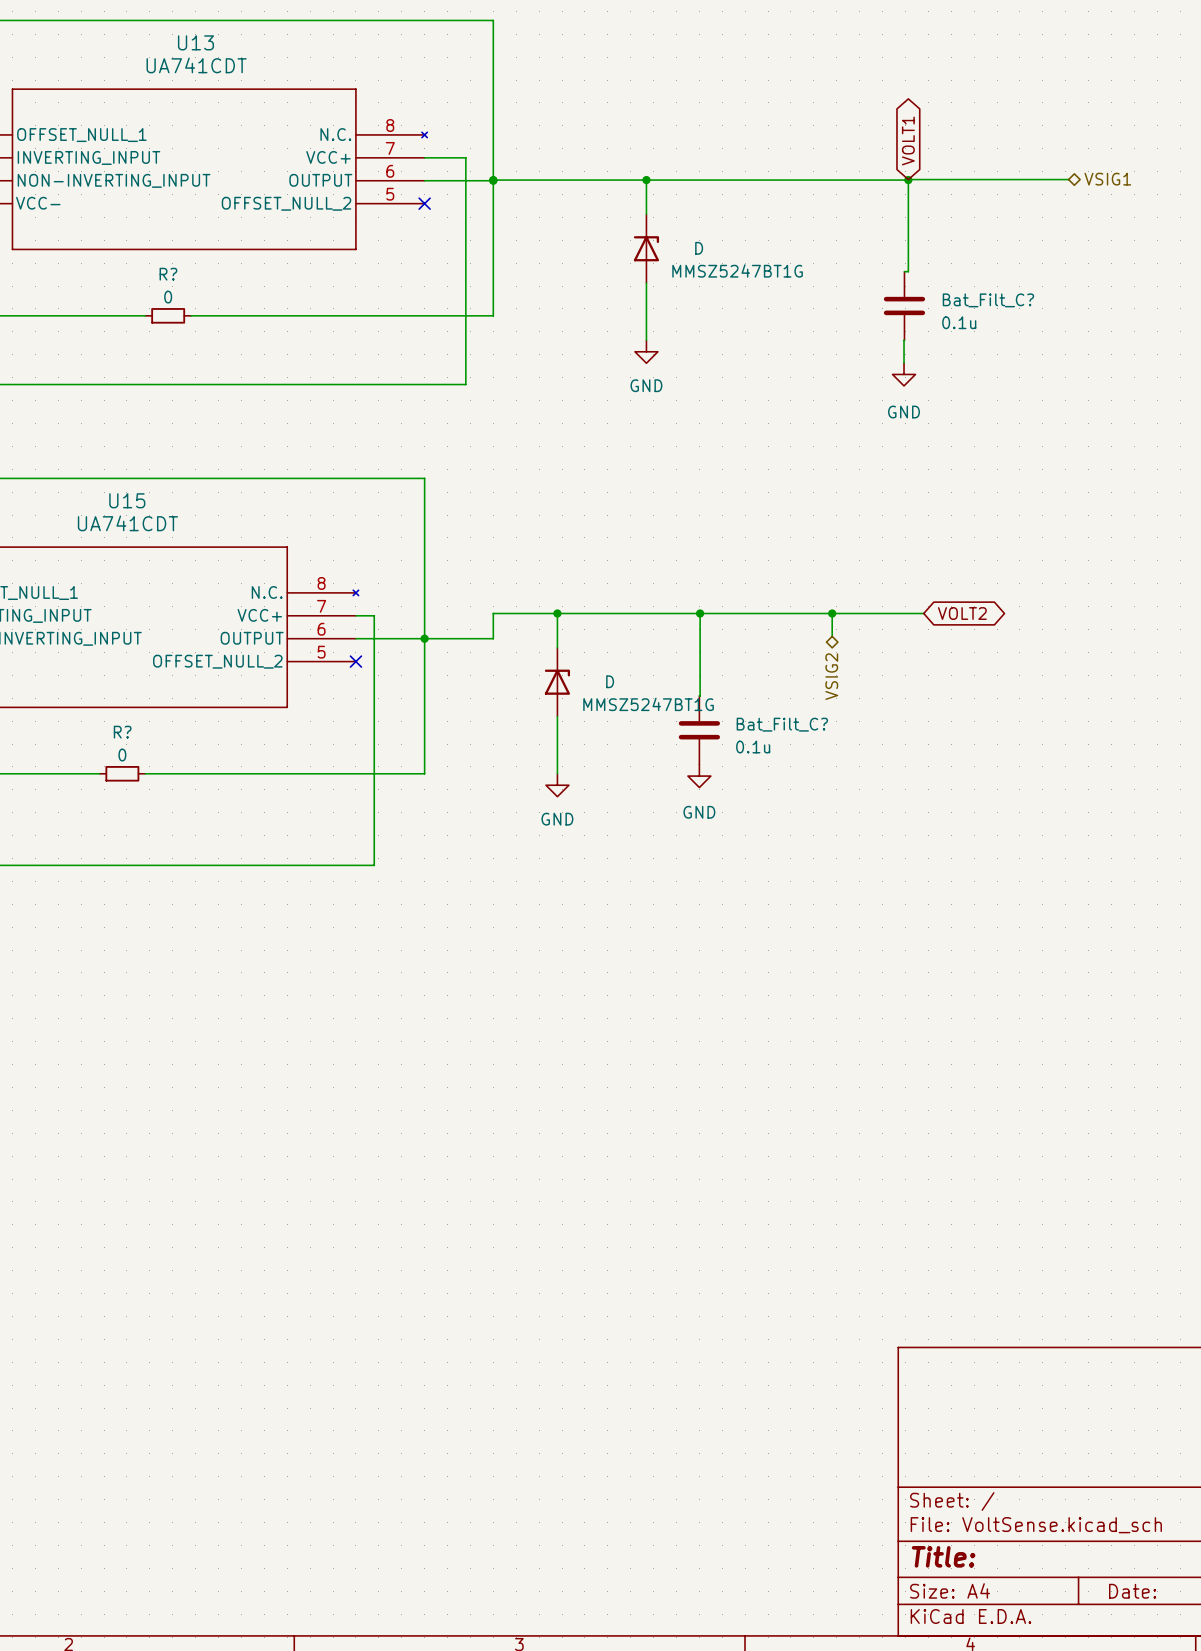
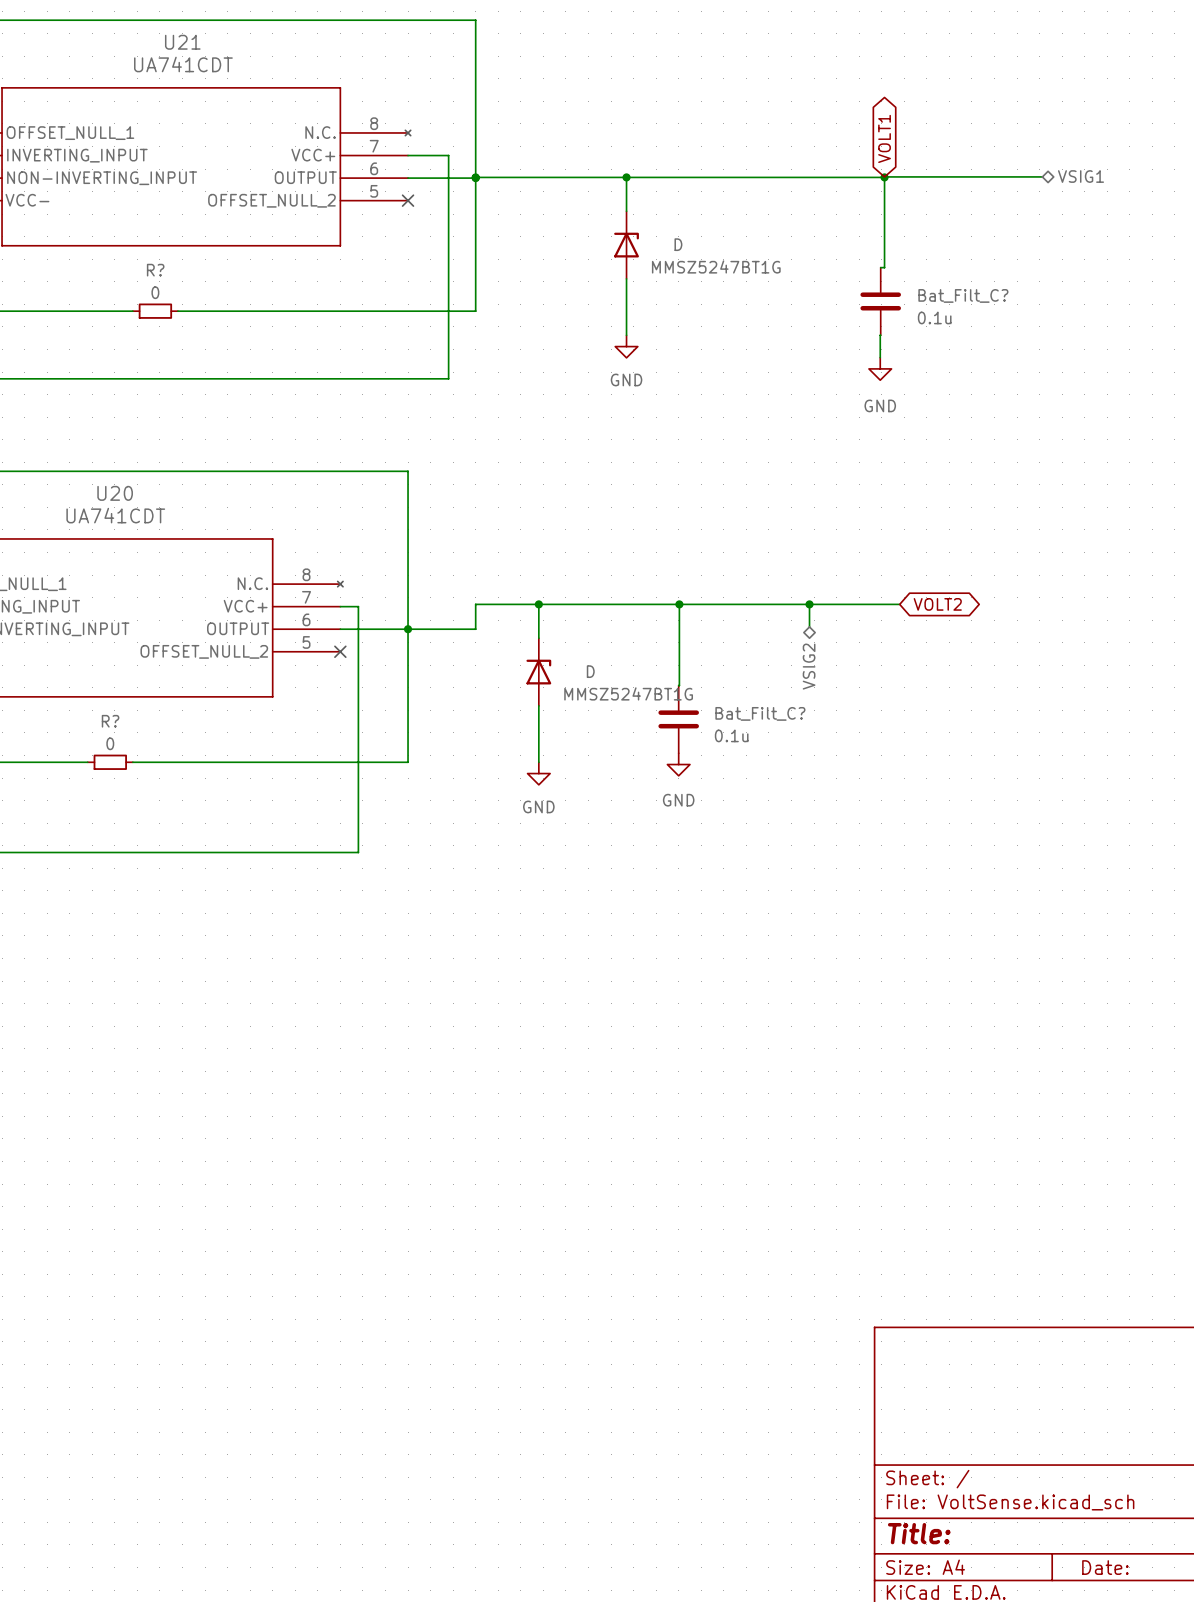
U13 name: U13 (195, 42) -> U21 (182, 42)
U15 name: U15 (127, 500) -> U20 (115, 493)

